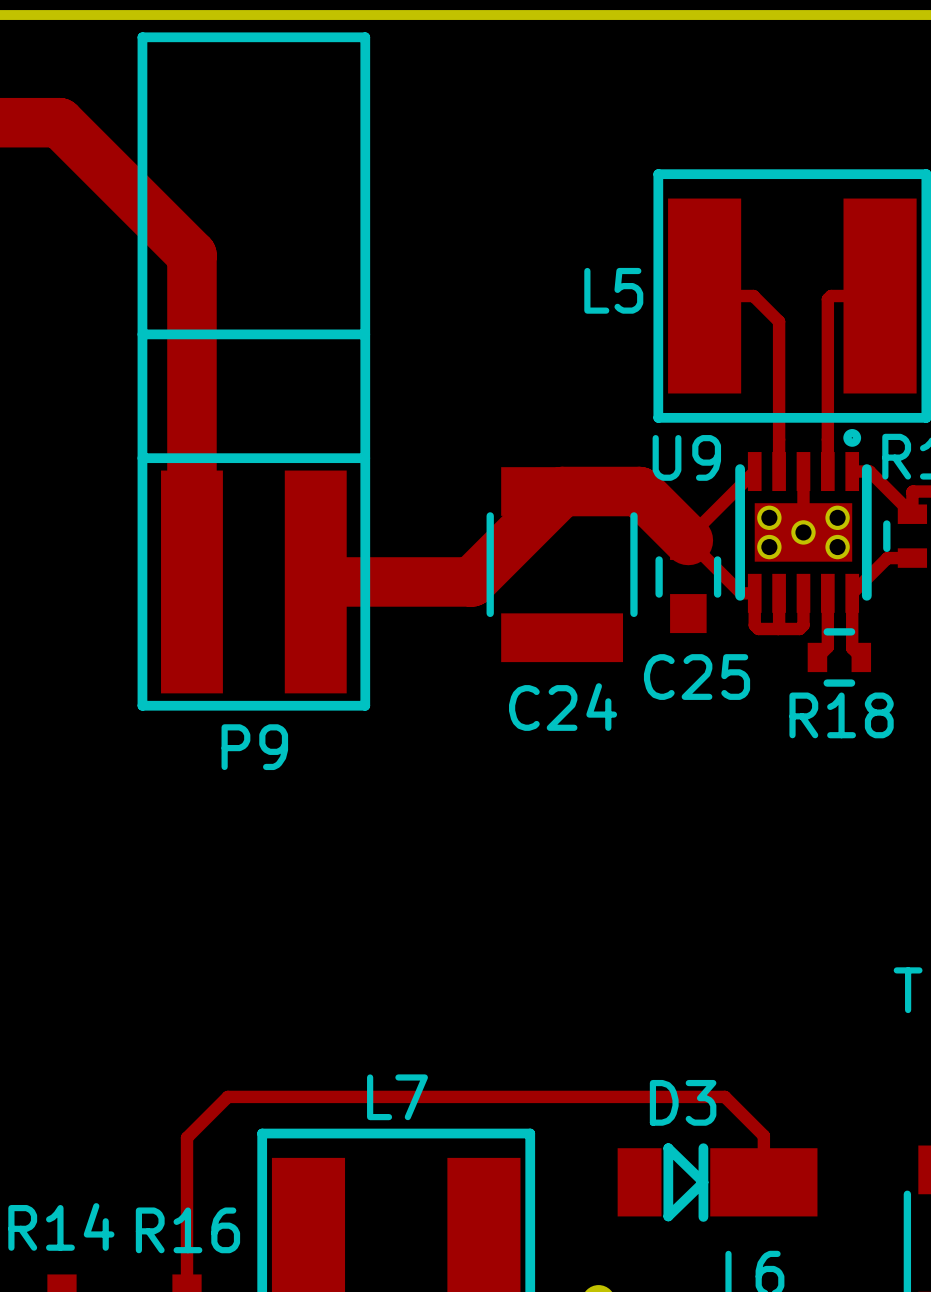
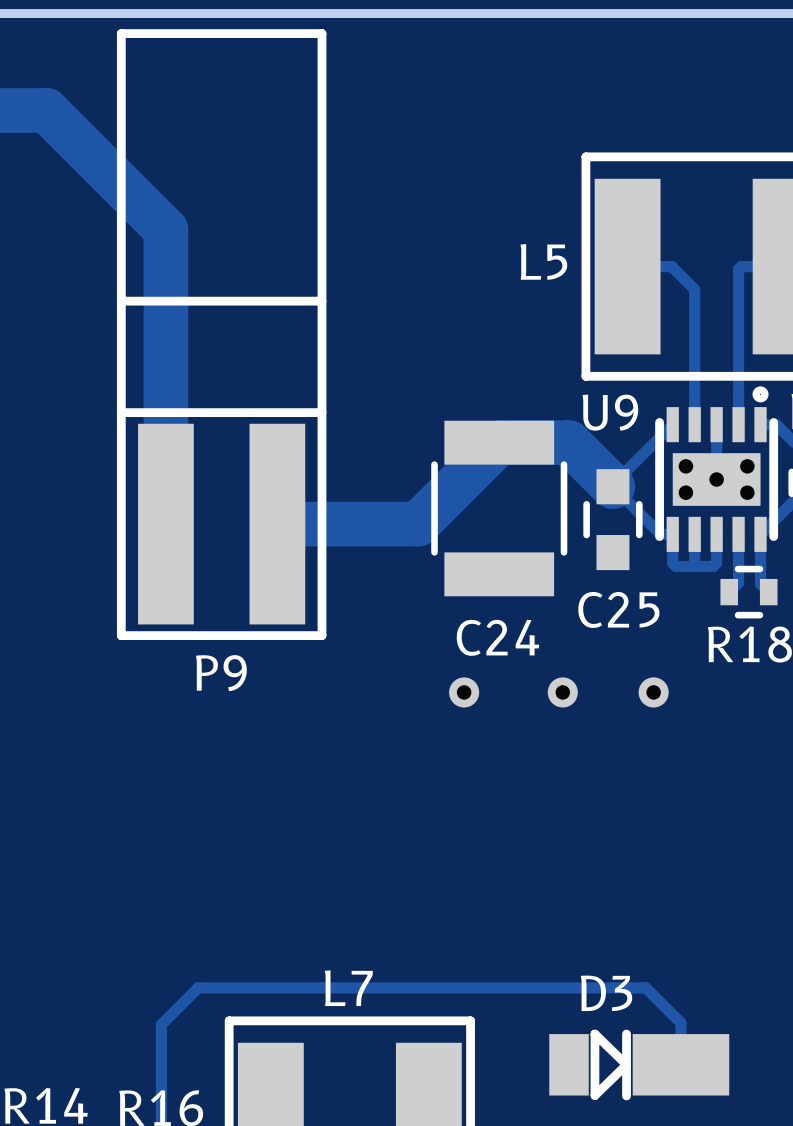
part: none -> (464, 692)
part: none -> (562, 692)
part: none -> (653, 692)

